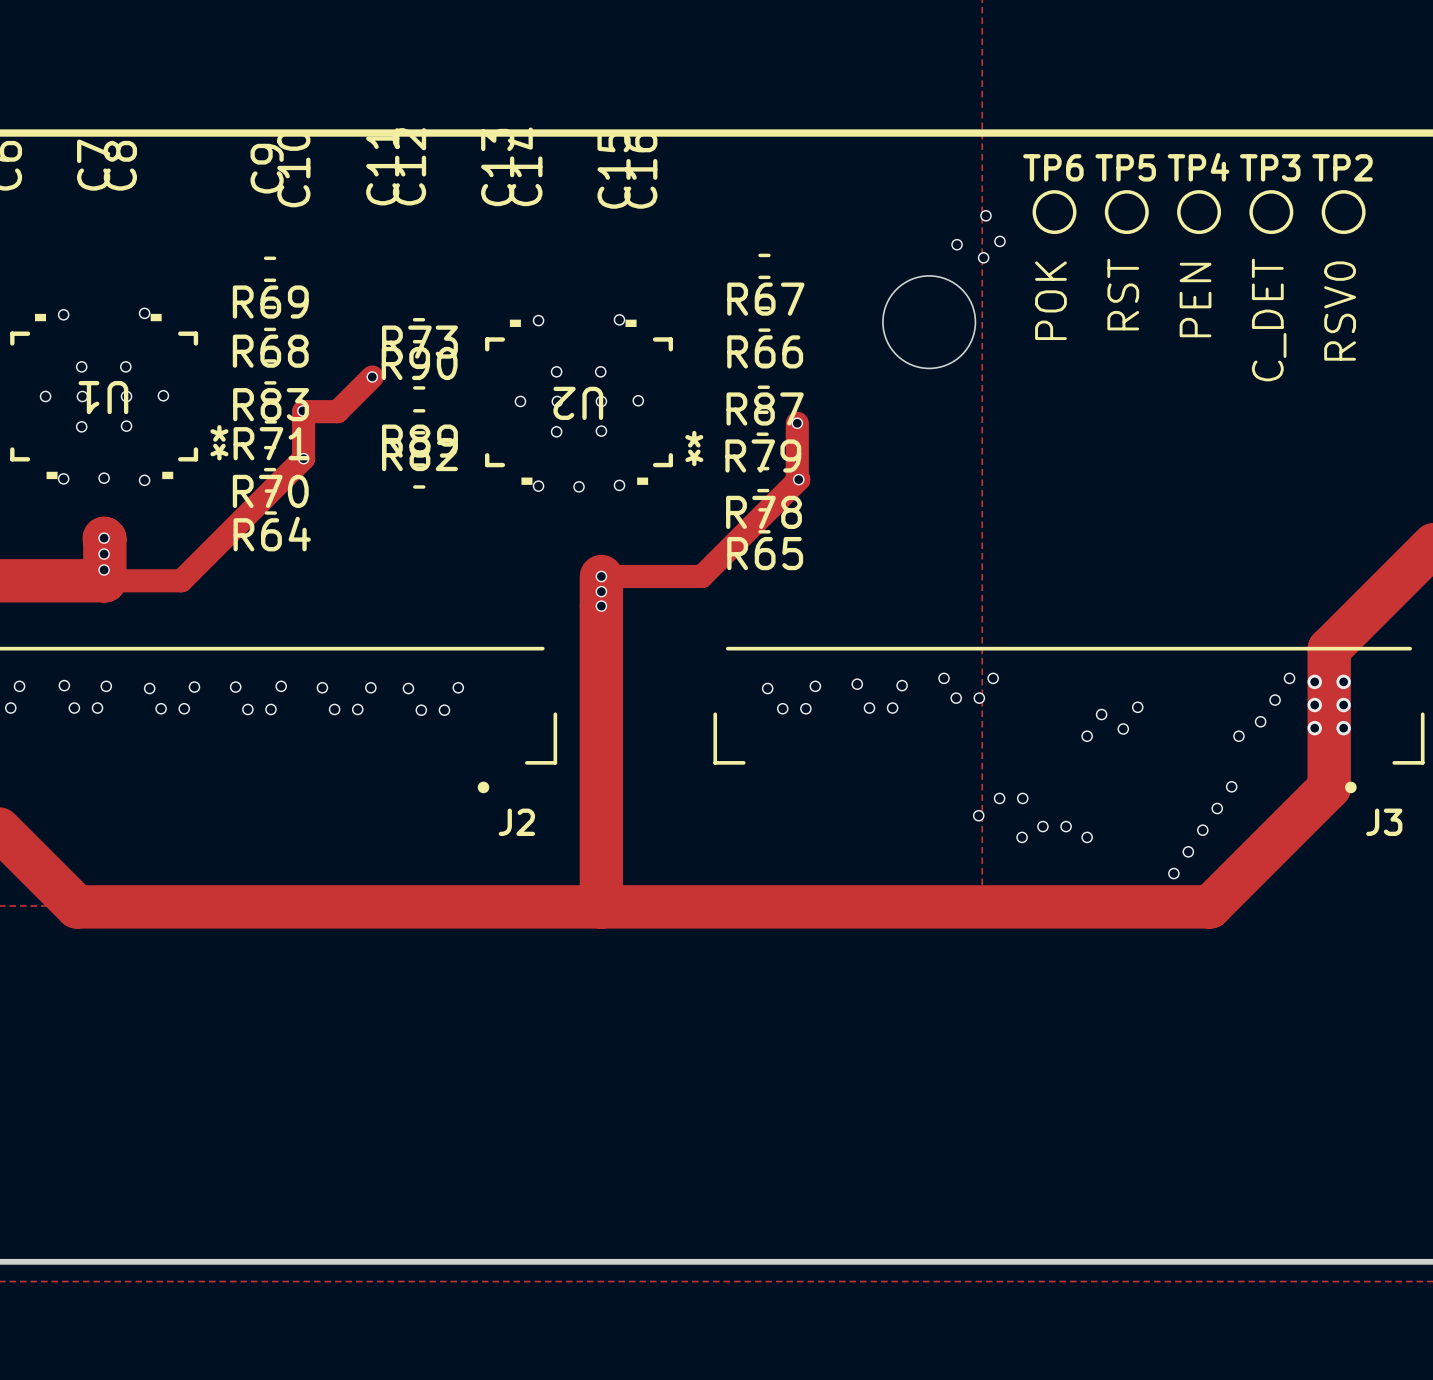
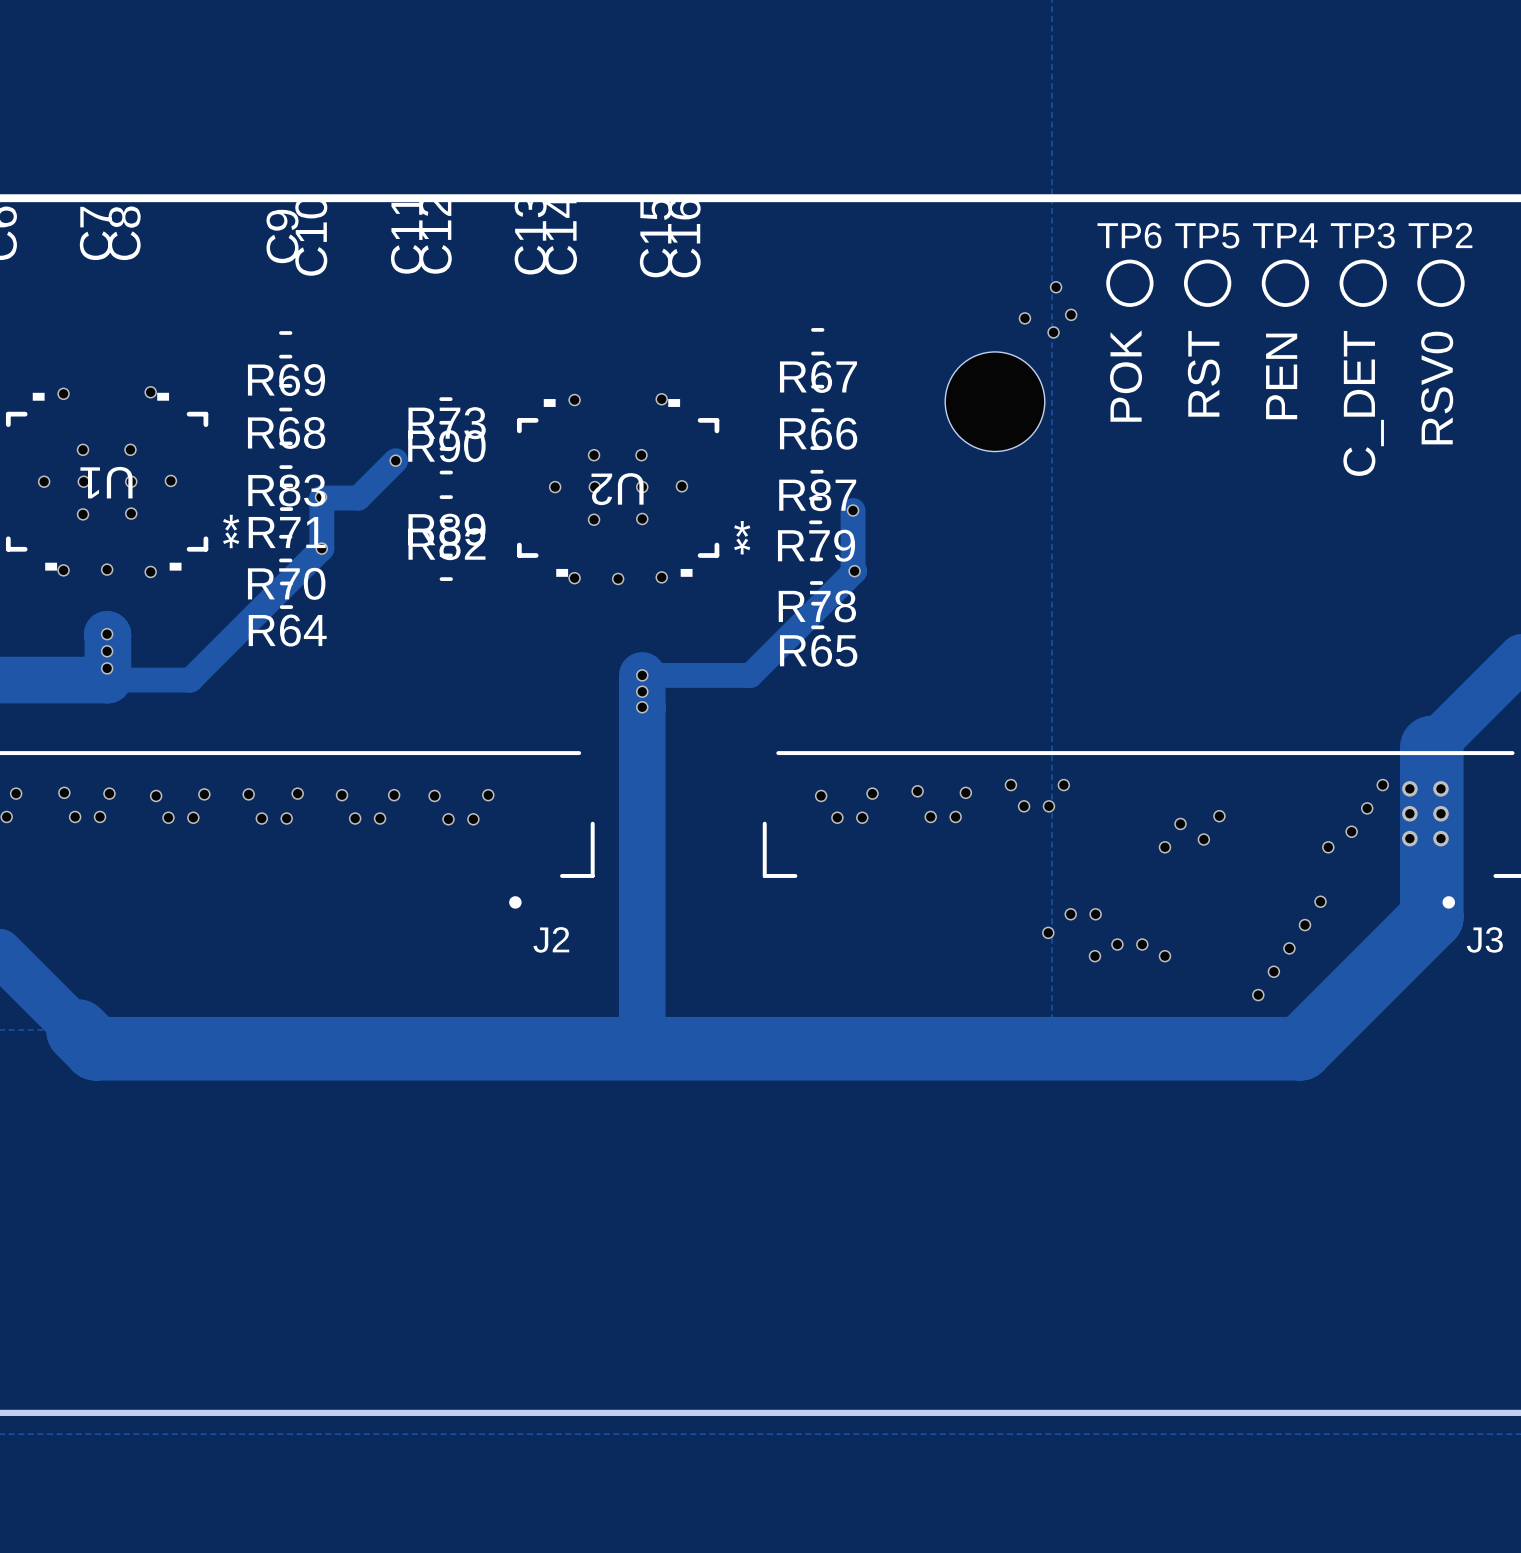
track: (1335, 643) (1329, 649) (1329, 787) (1209, 906) (77, 906) -> (1431, 747) (1431, 917) (1300, 1048) (95, 1048) (77, 1030)

